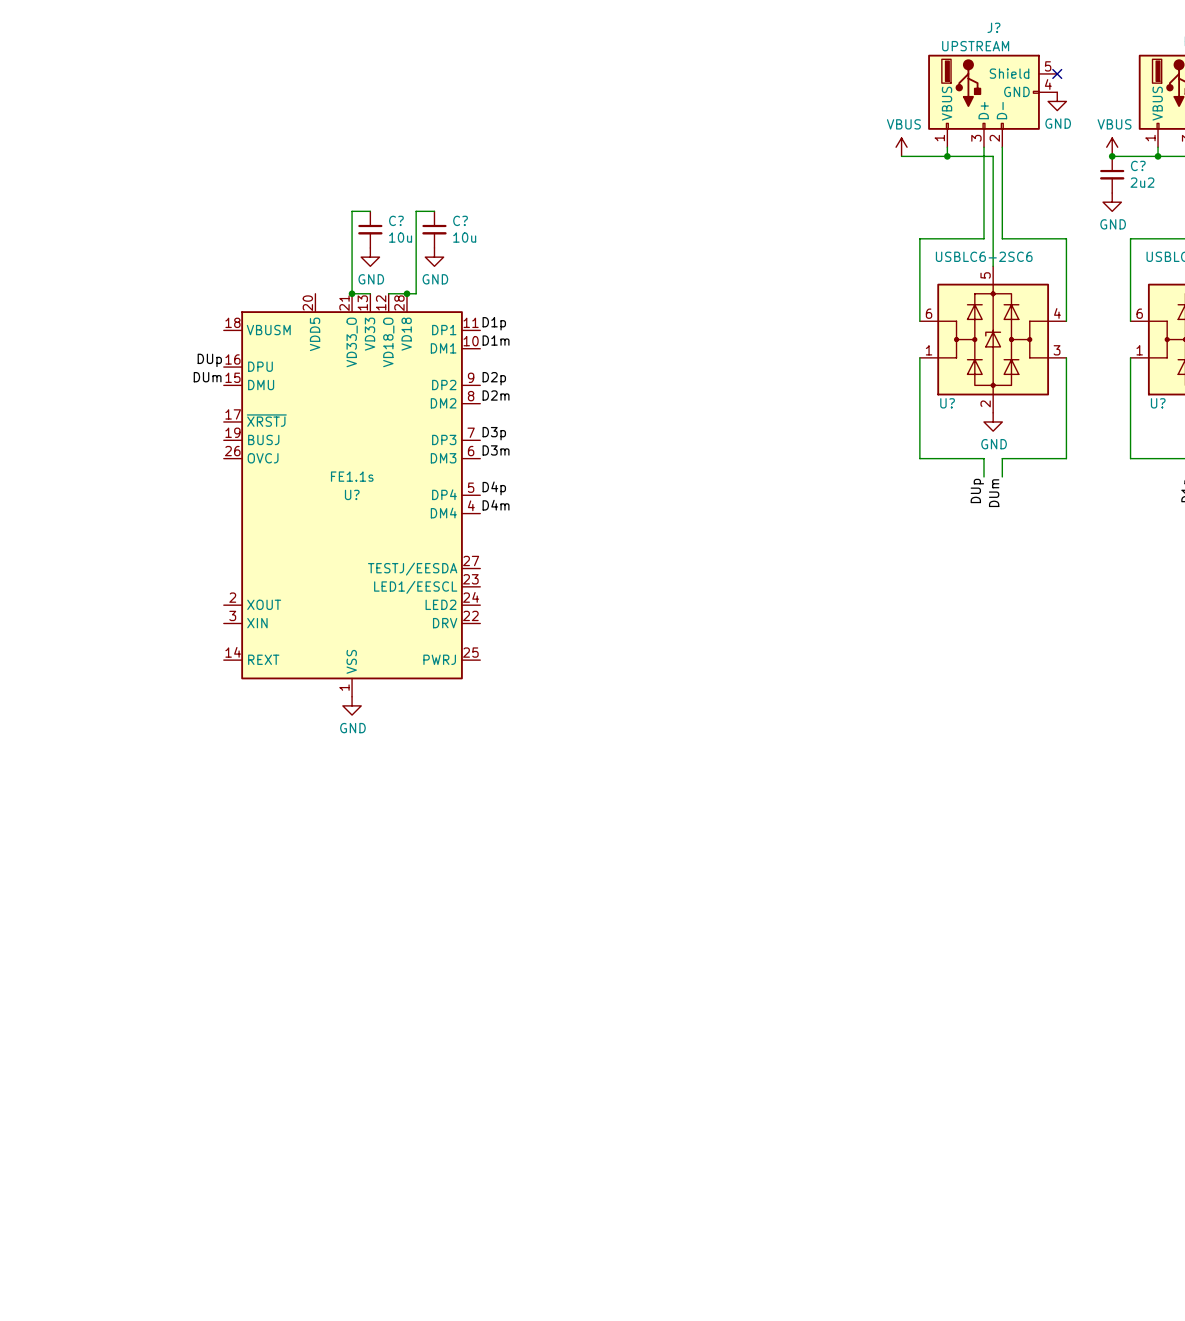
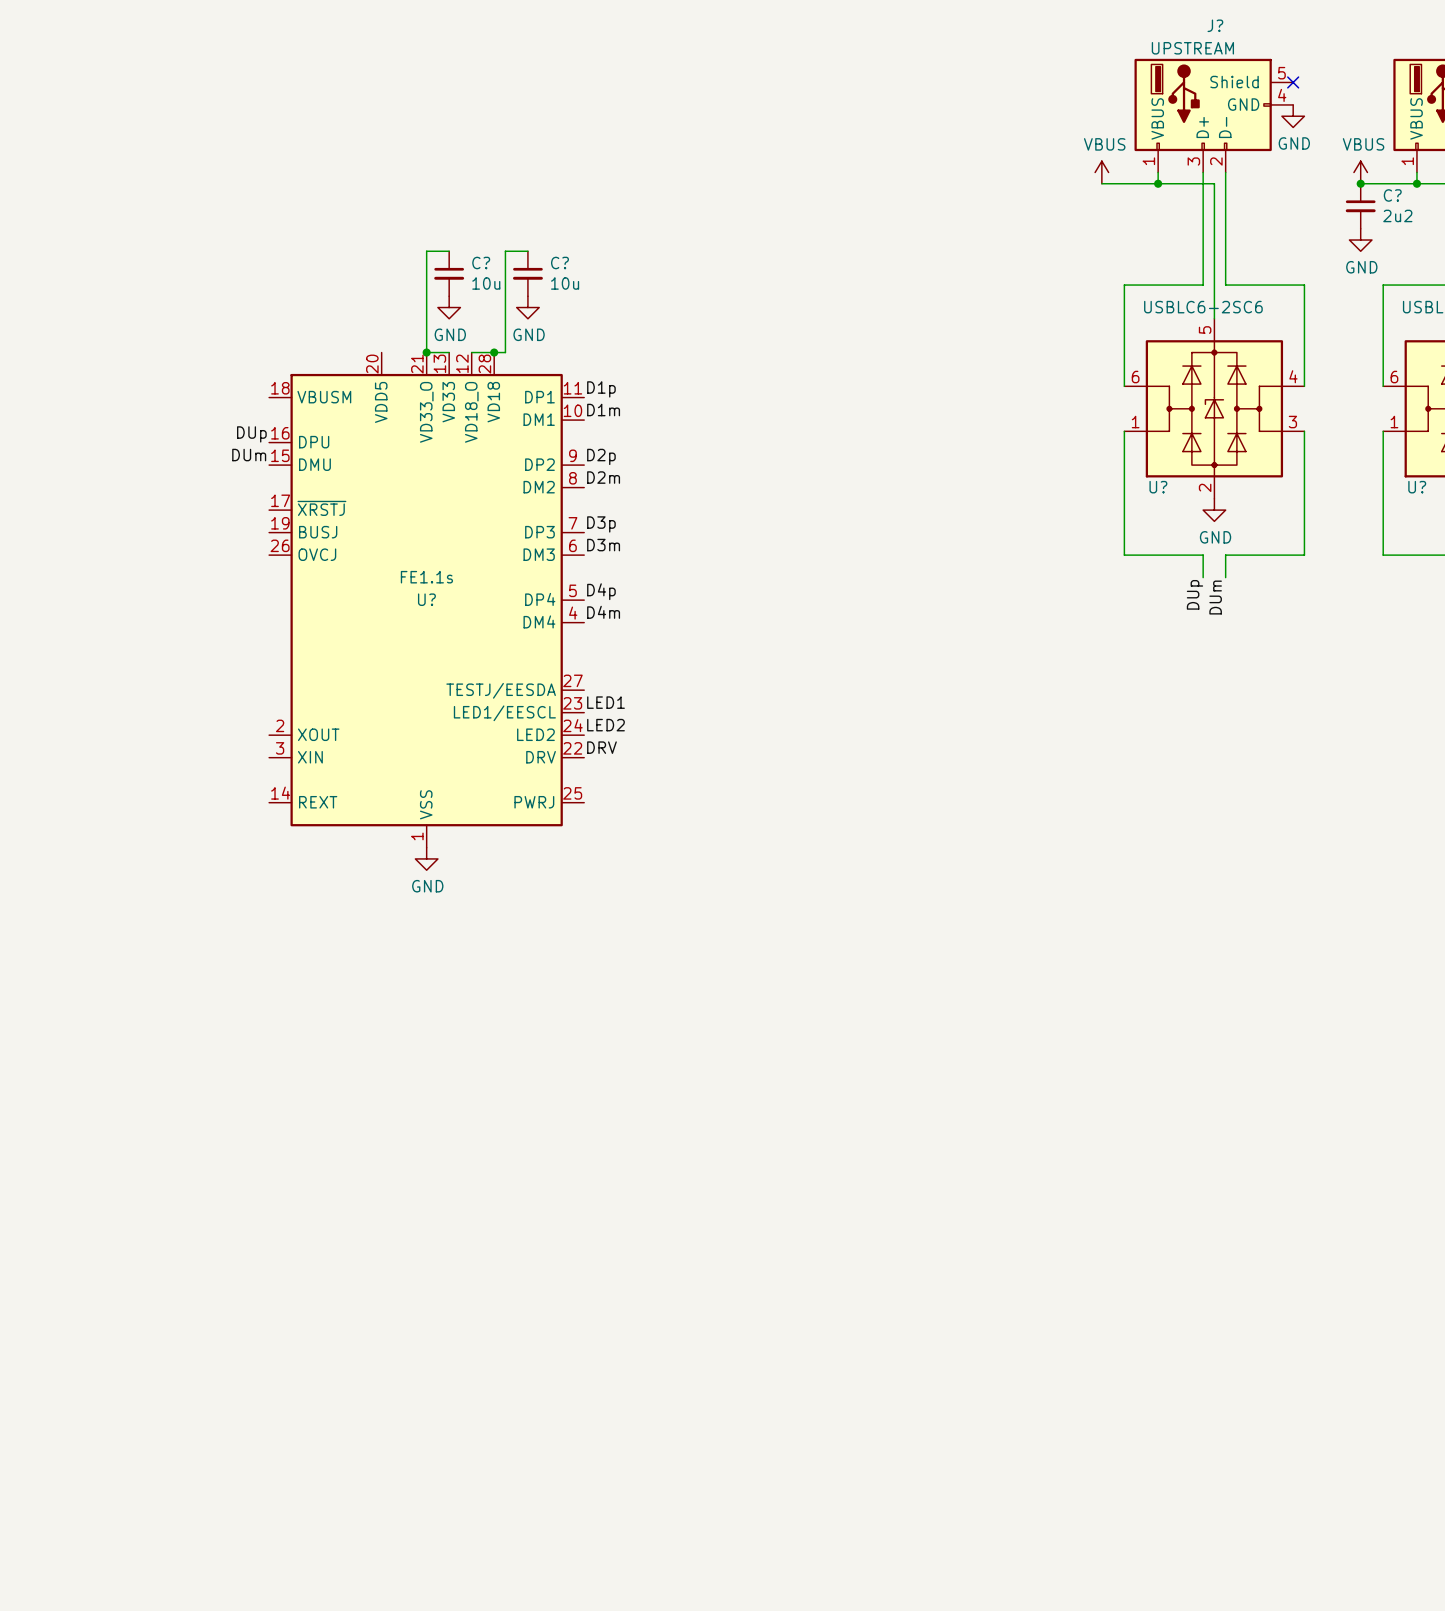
label: none -> LED1 (606, 702)
label: none -> LED2 (606, 725)
label: none -> DRV (601, 747)

